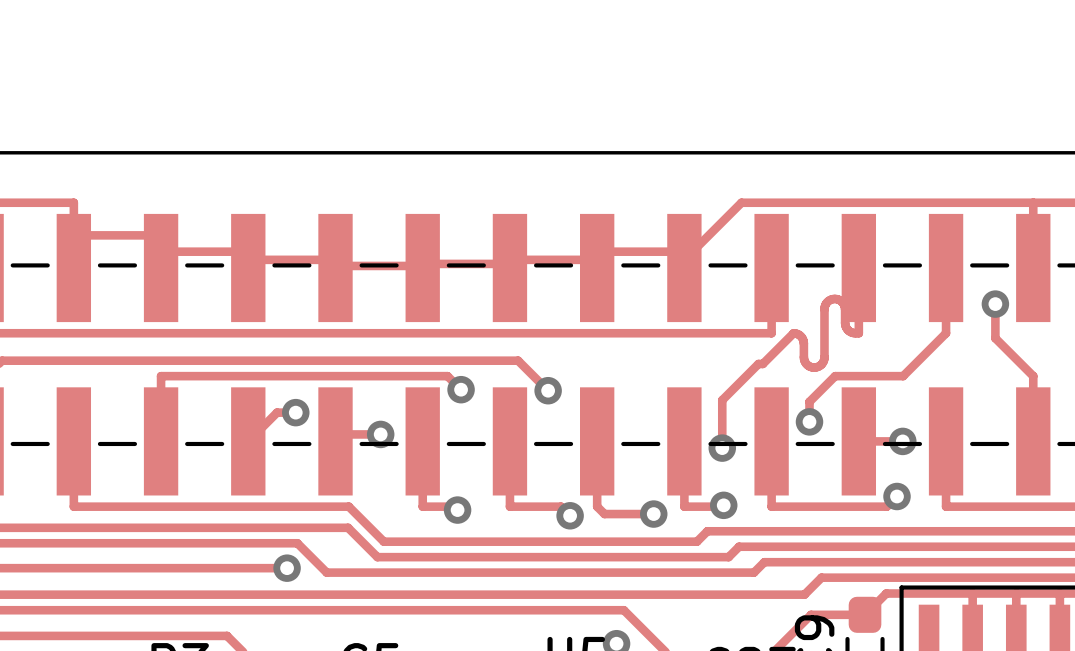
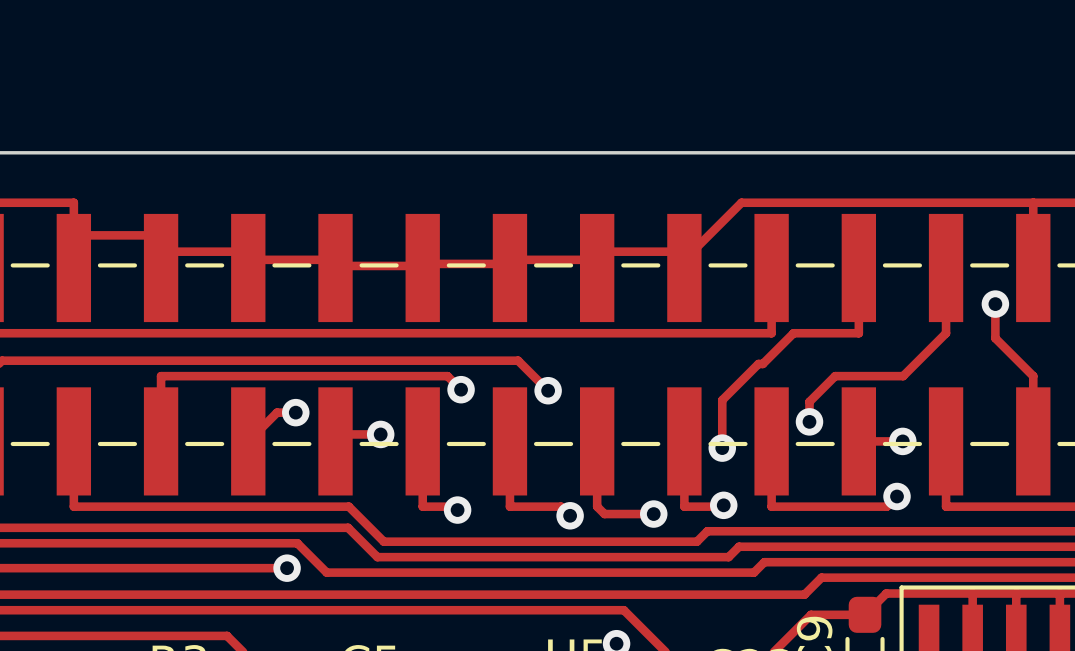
track: (793, 333) (798, 334) (802, 339) (804, 361) (809, 366) (814, 367) (820, 365) (824, 359) (824, 309) (828, 301) (834, 298) (842, 302) (846, 327) (850, 332) (855, 333) -> (793, 333) (855, 333)

